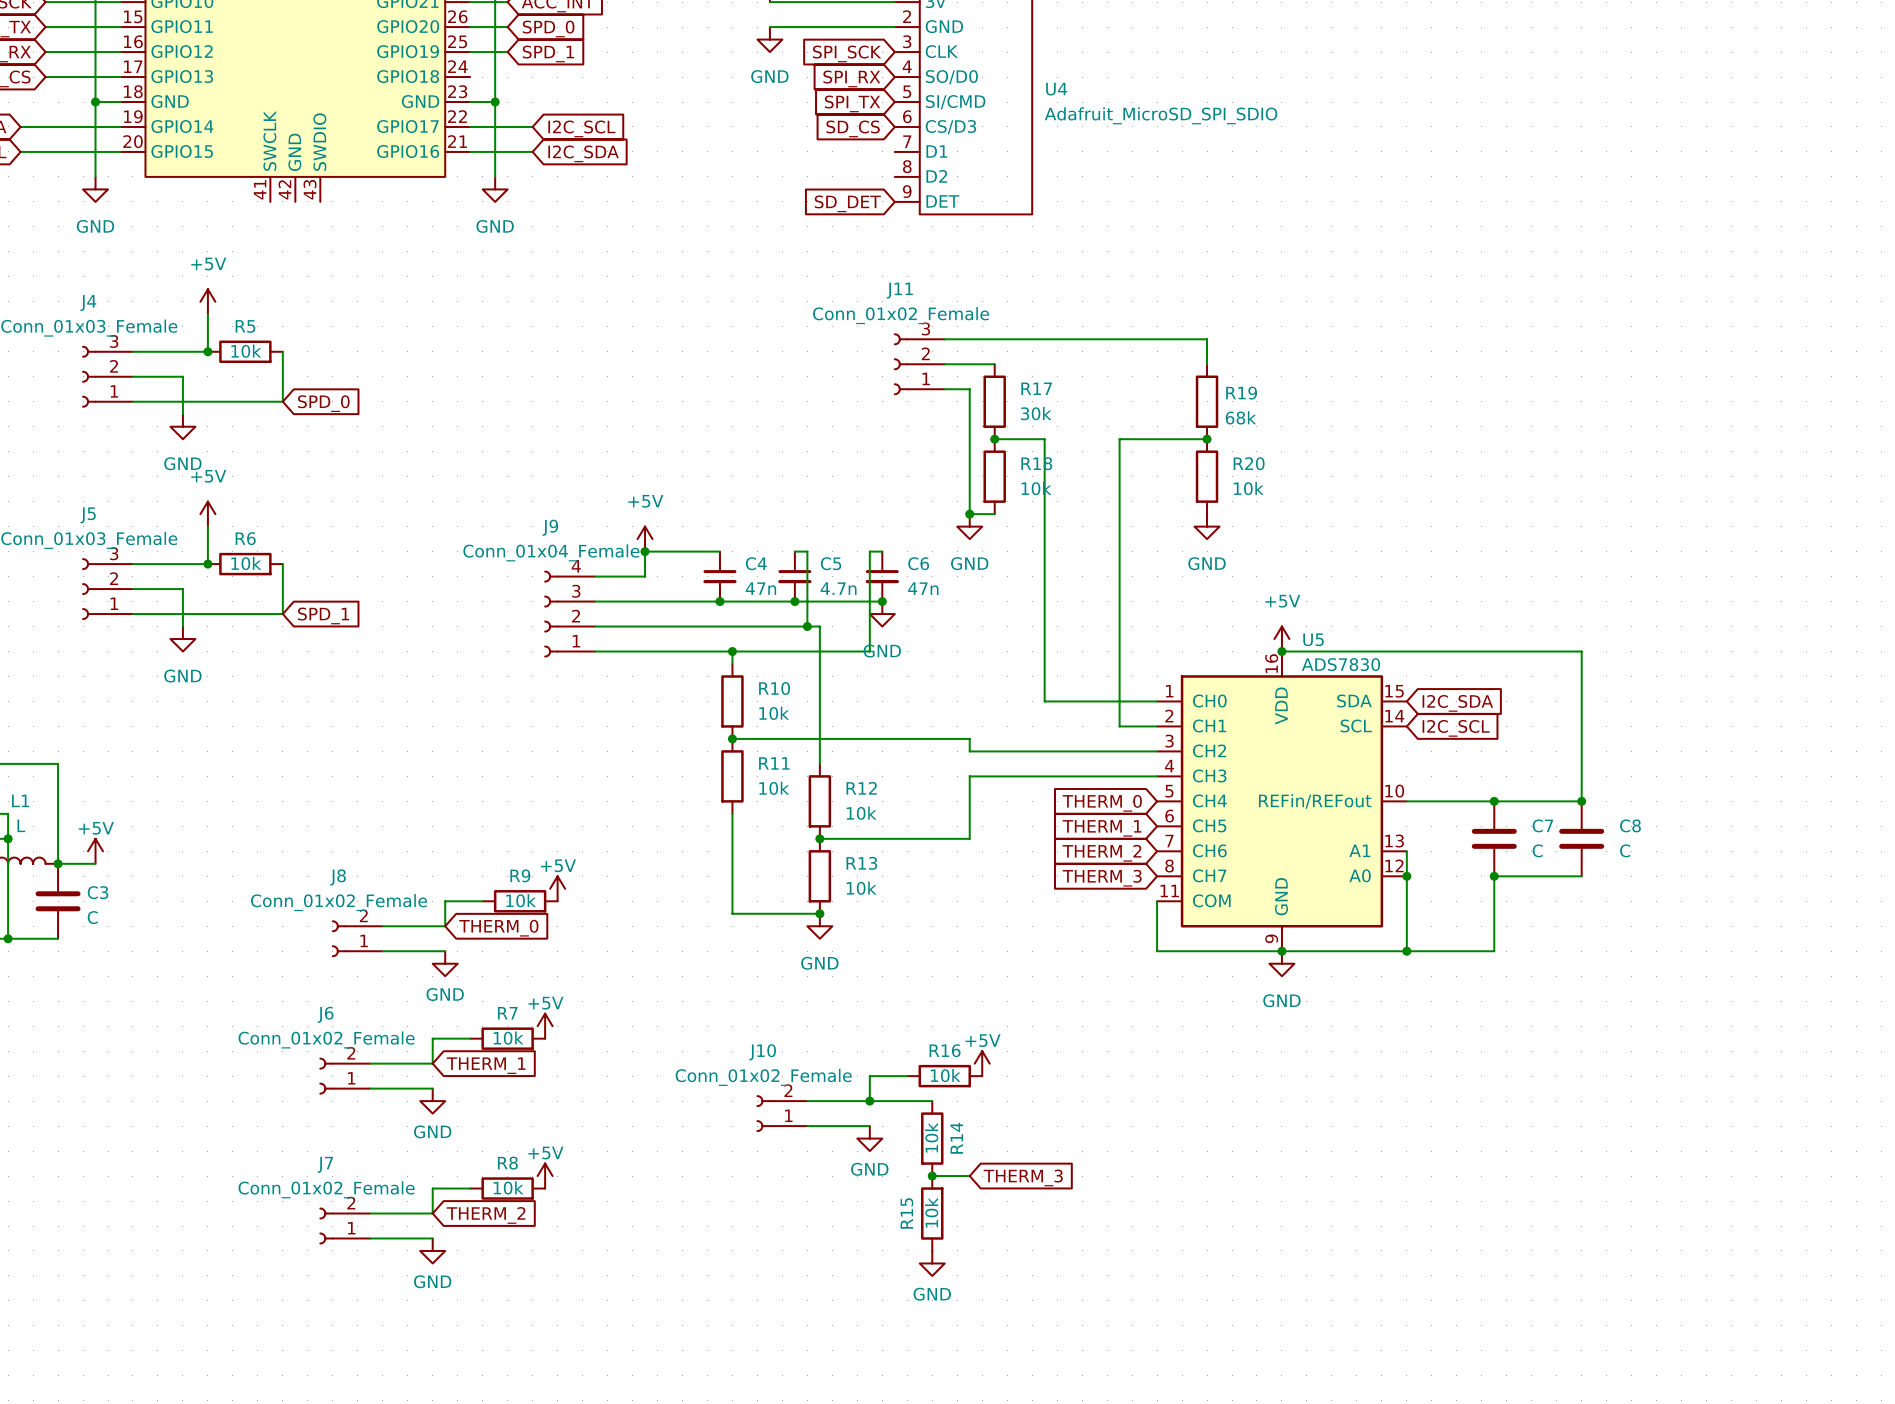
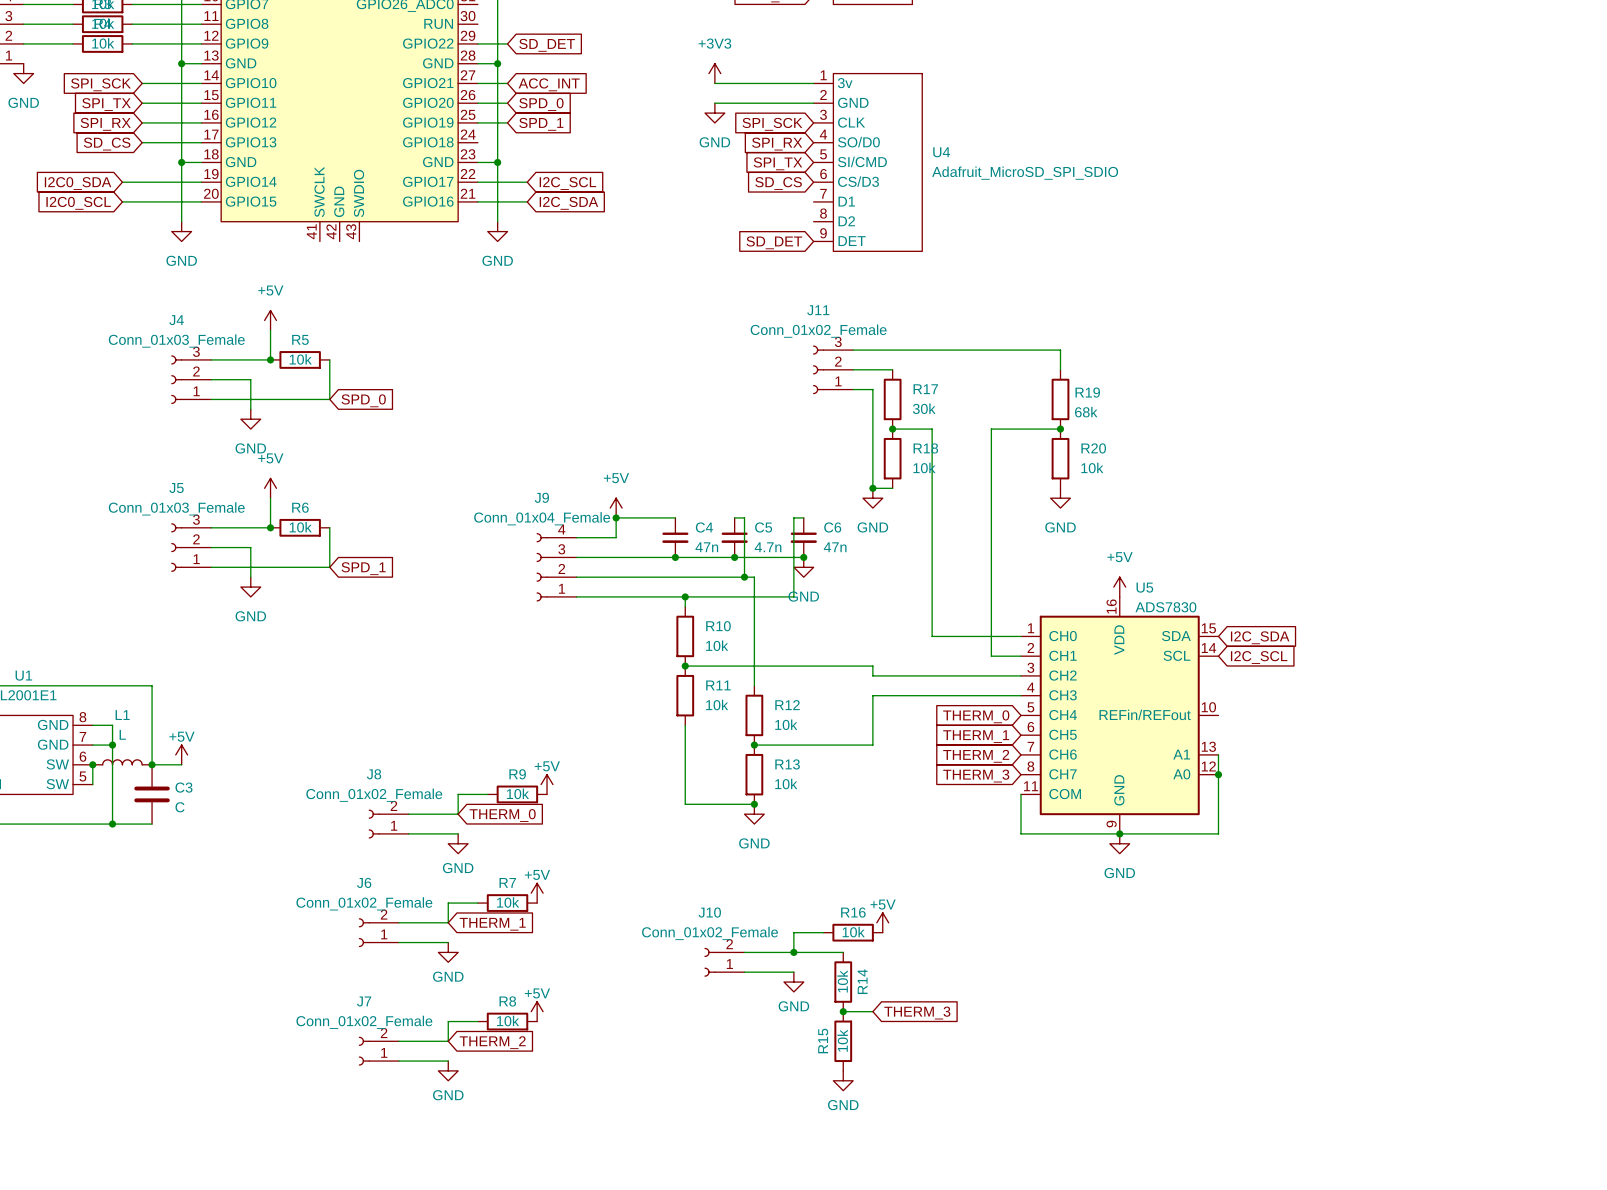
wire: (1281, 651) (1581, 651) (1581, 801) (1406, 801) -> none
junction: (1281, 651) -> none
junction: (1494, 801) -> none
junction: (1581, 801) -> none
C7: C (1494, 838) -> none
C8: C (1581, 838) -> none
junction: (1494, 876) -> none
wire: (1581, 876) (1494, 876) (1494, 951) (1406, 951) -> none
junction: (1406, 951) -> none

